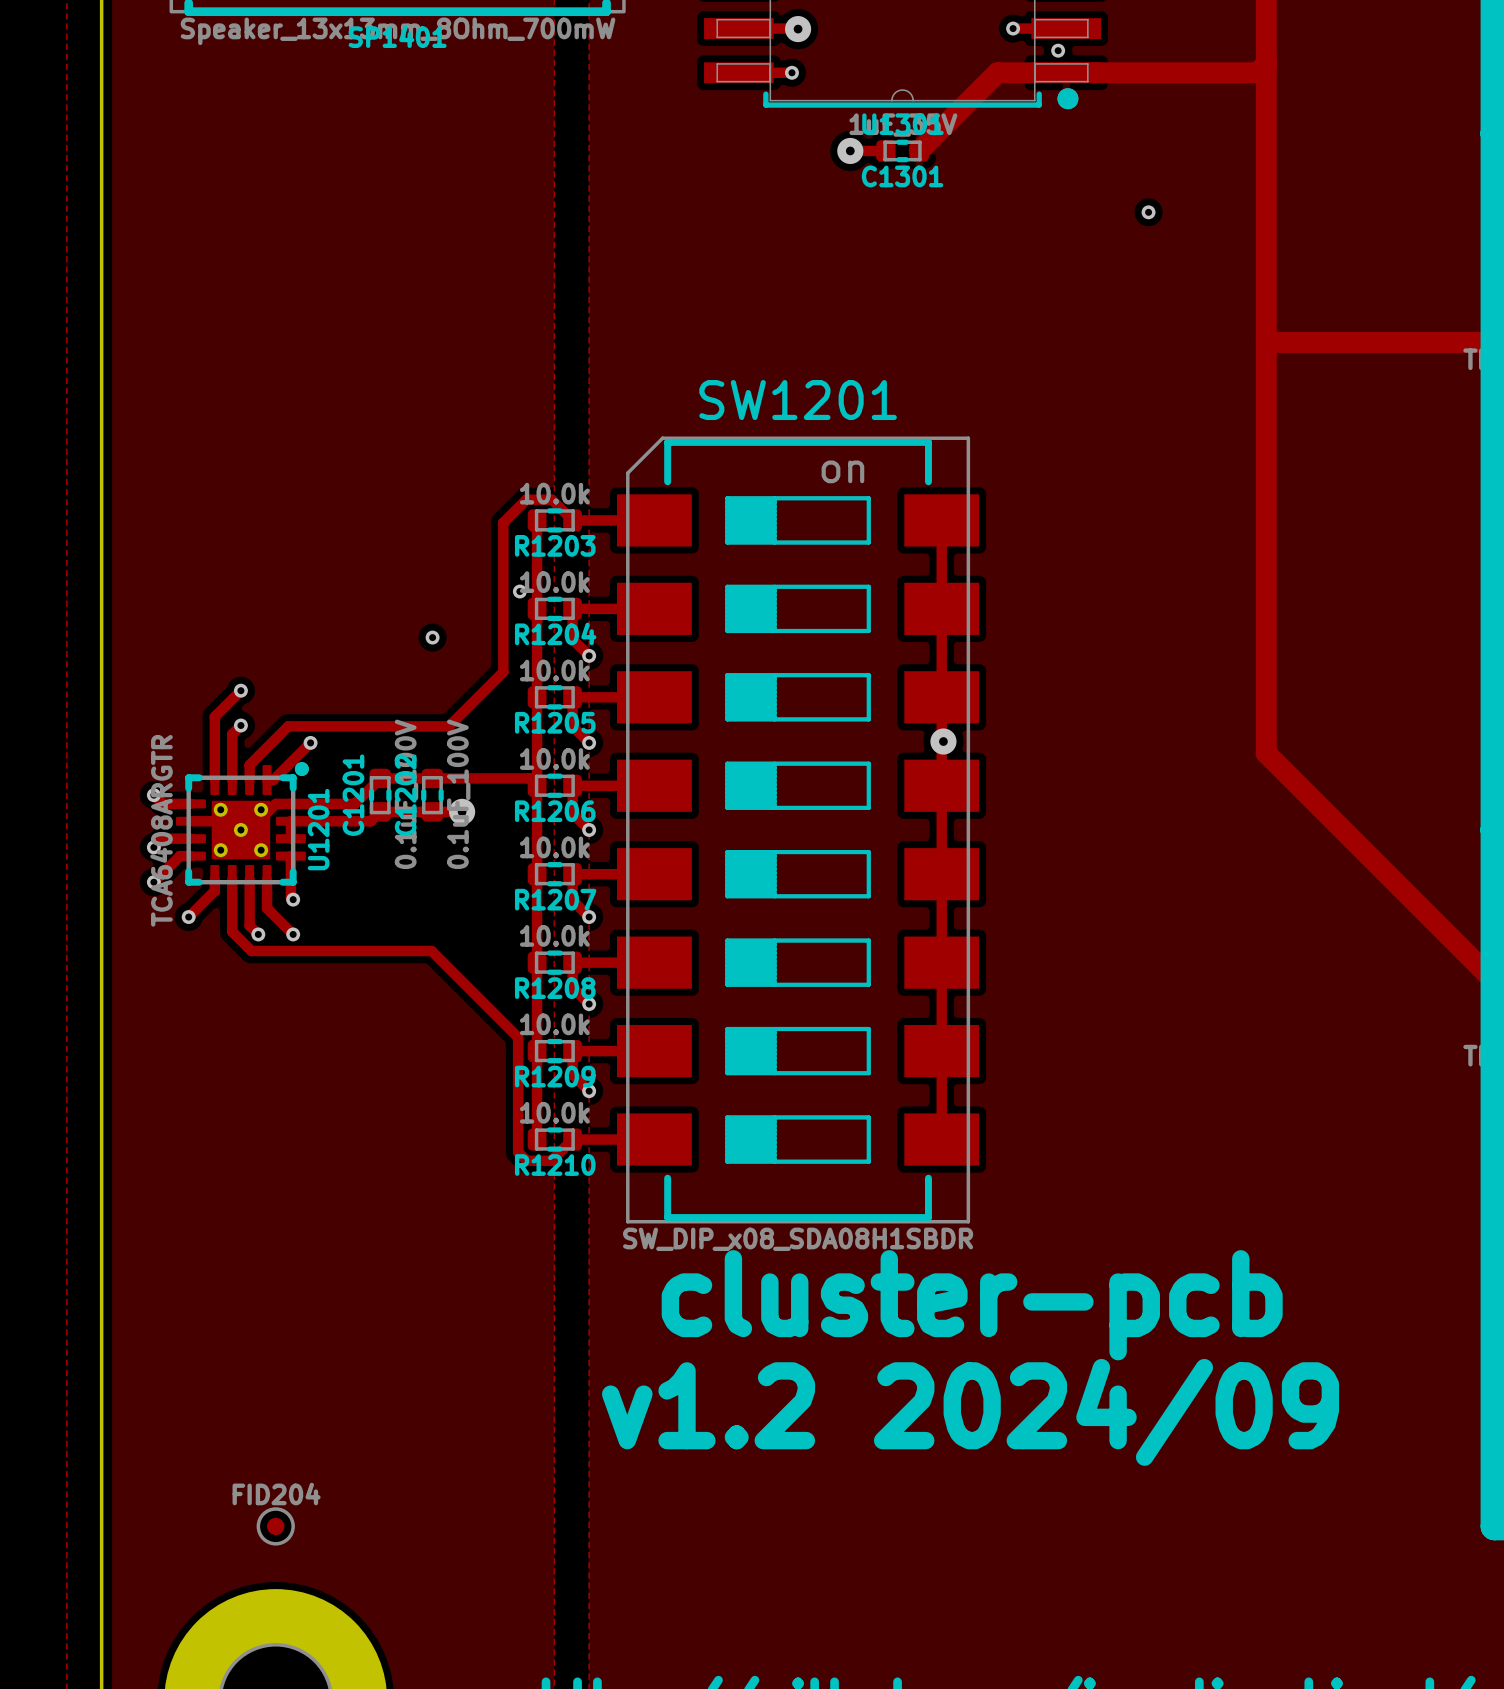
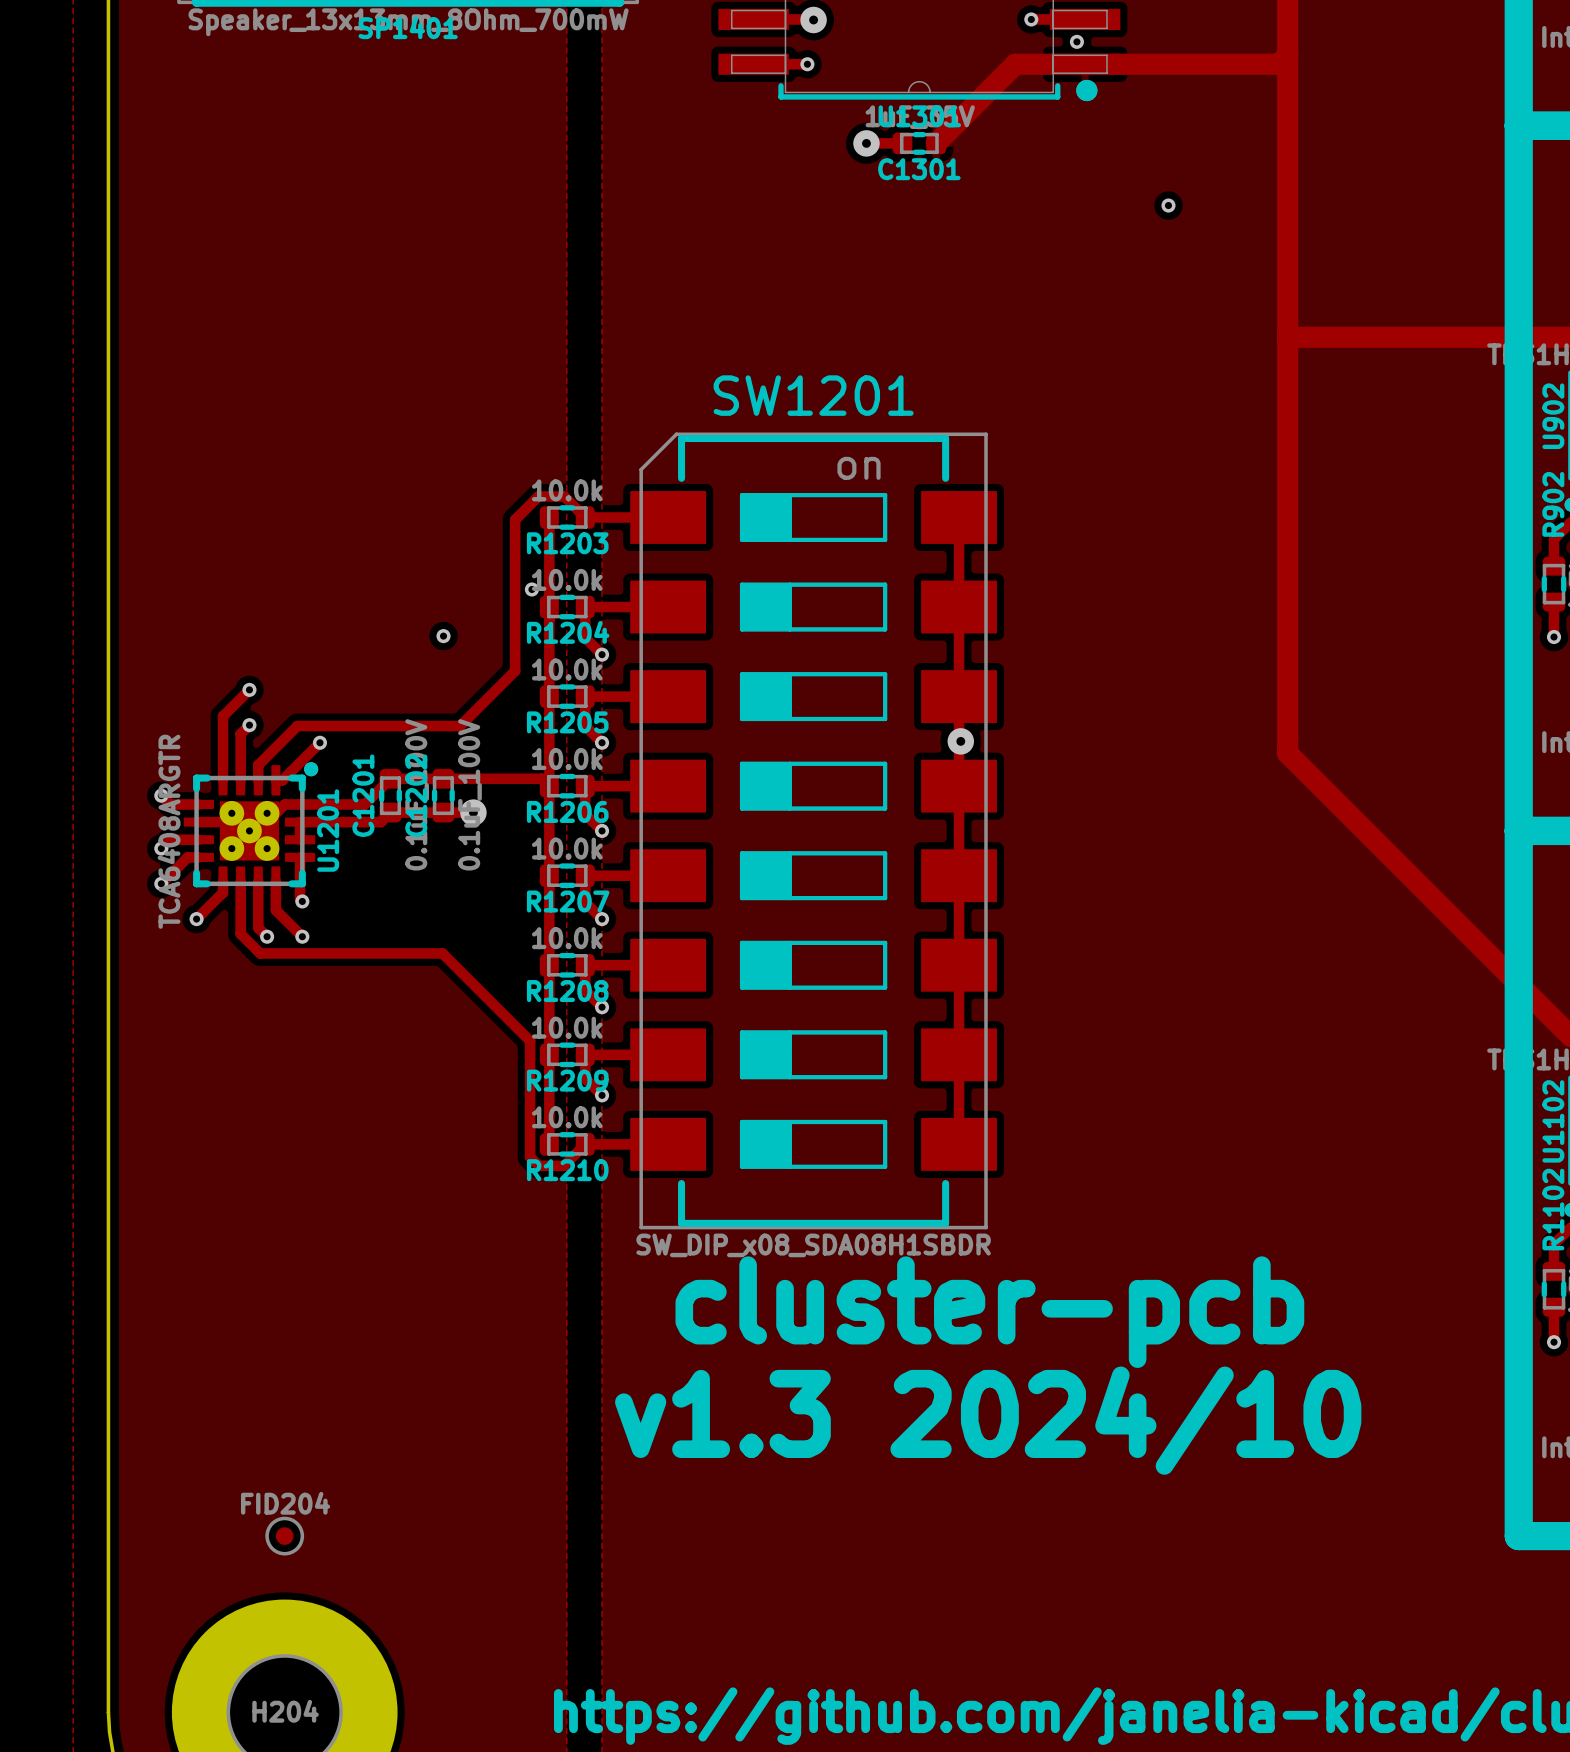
U1201 footprint: [175, 762, 309, 895] -> [183, 762, 319, 897]
text: v1.2 2024/09 (970, 1412) -> v1.3 2024/10 (988, 1420)

